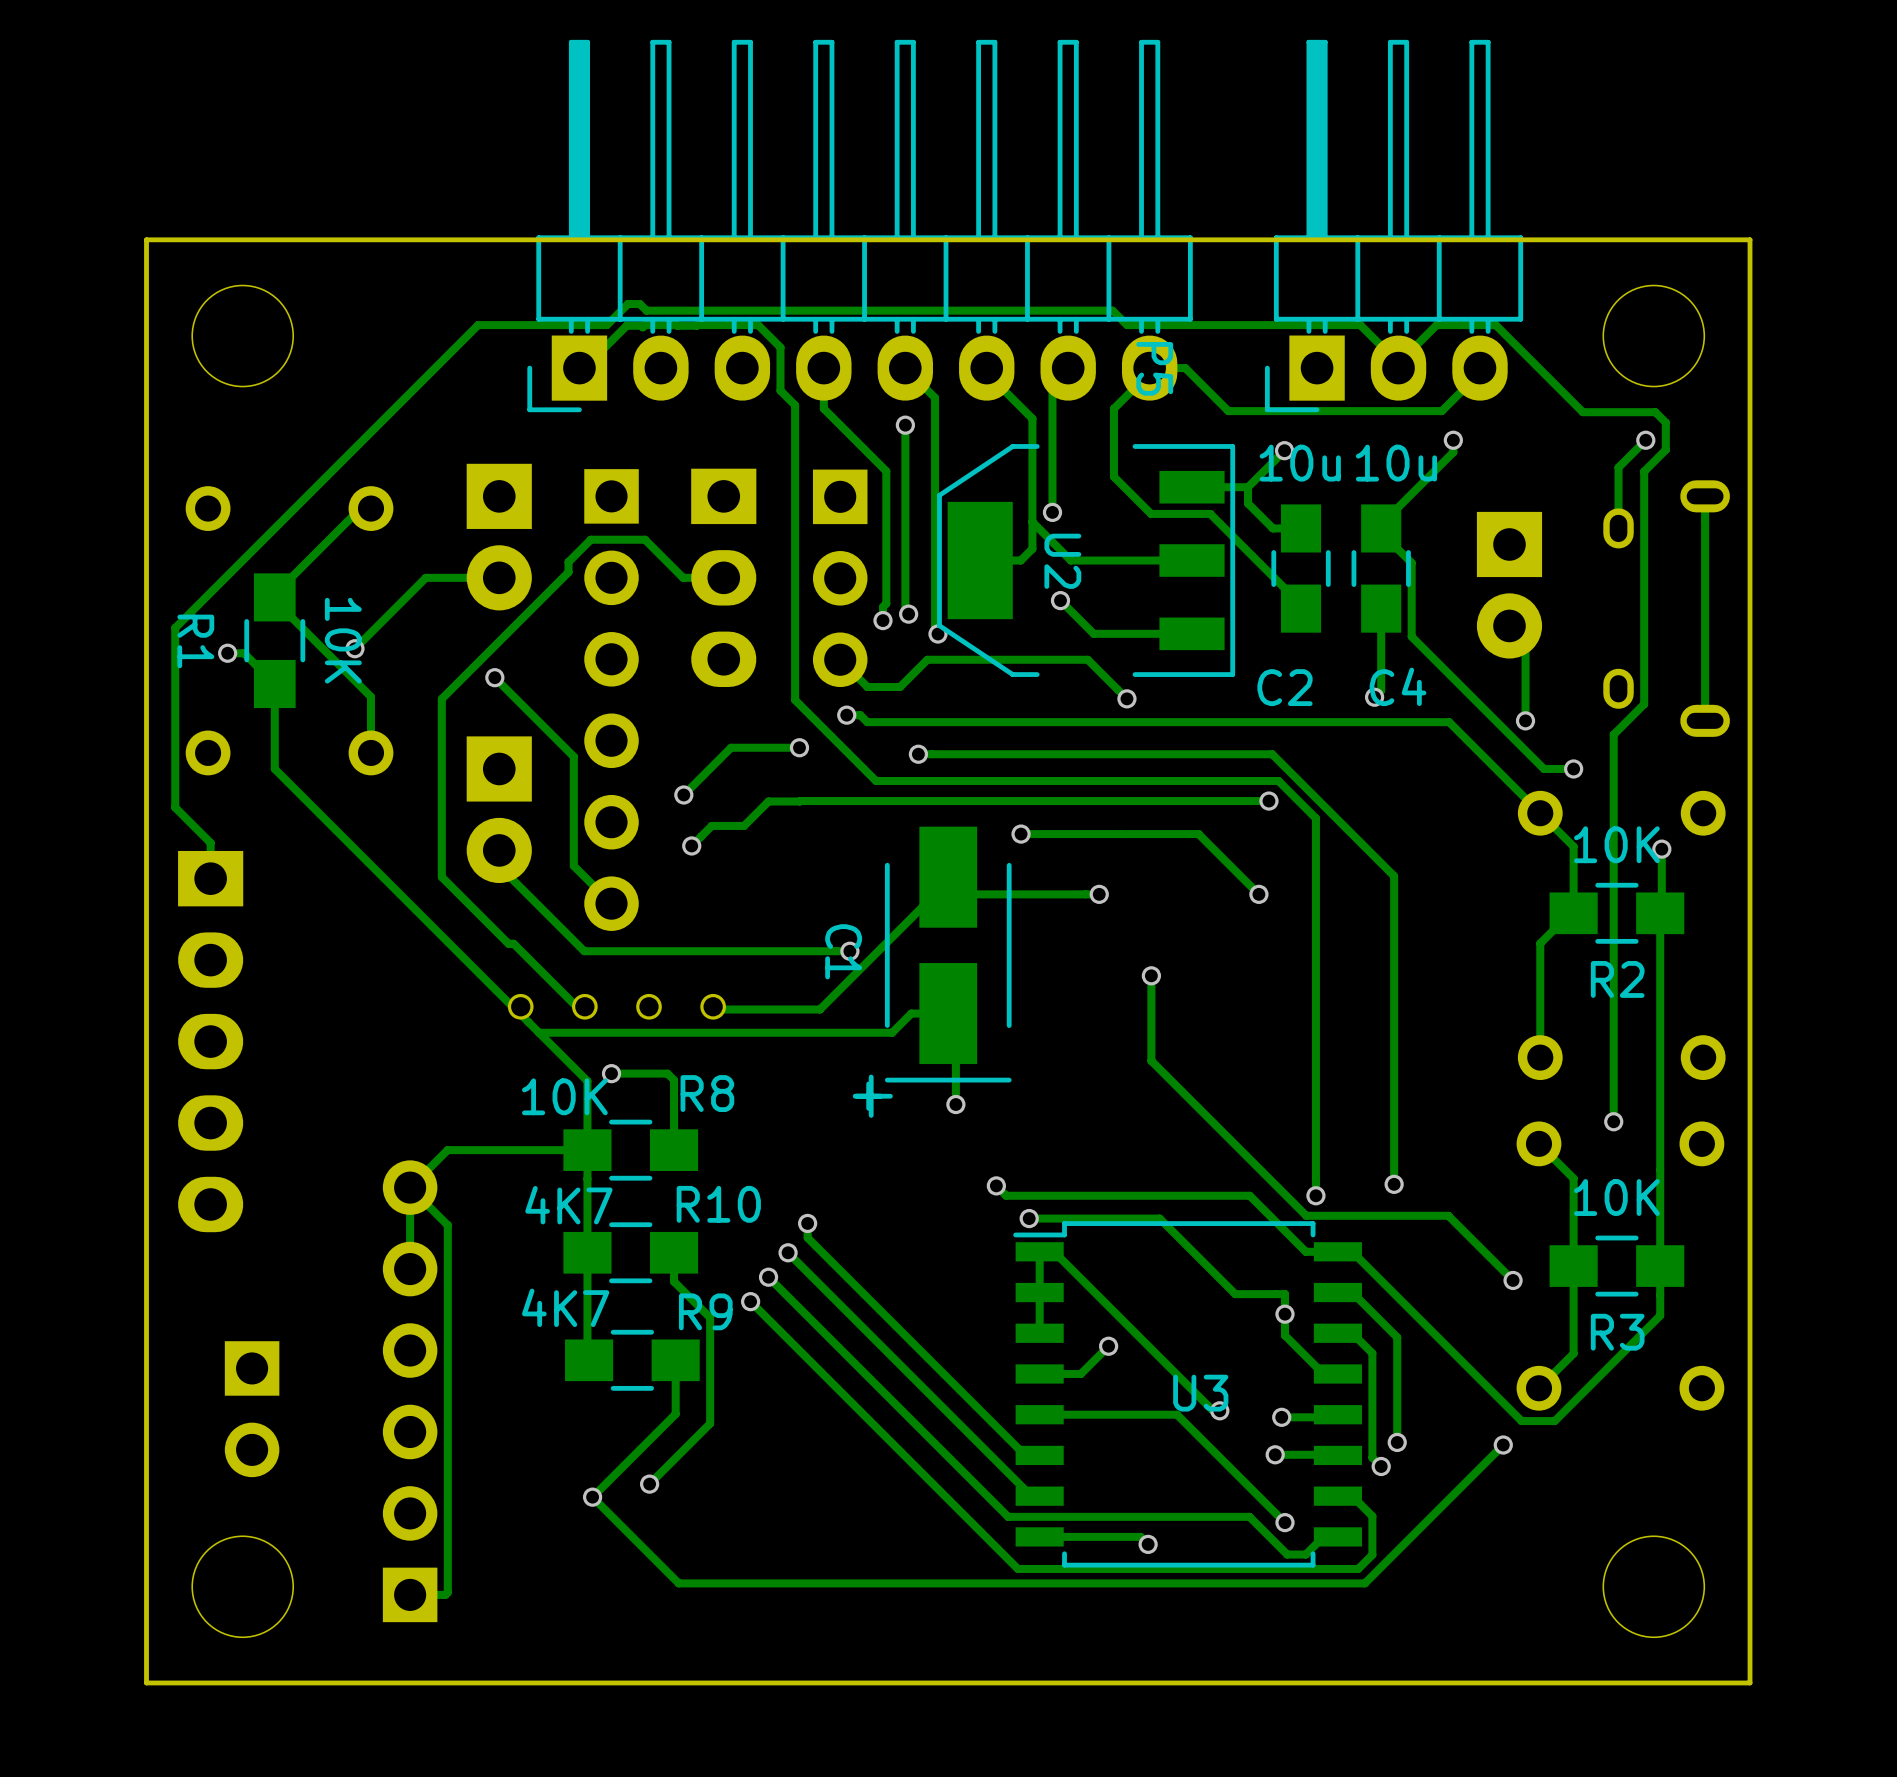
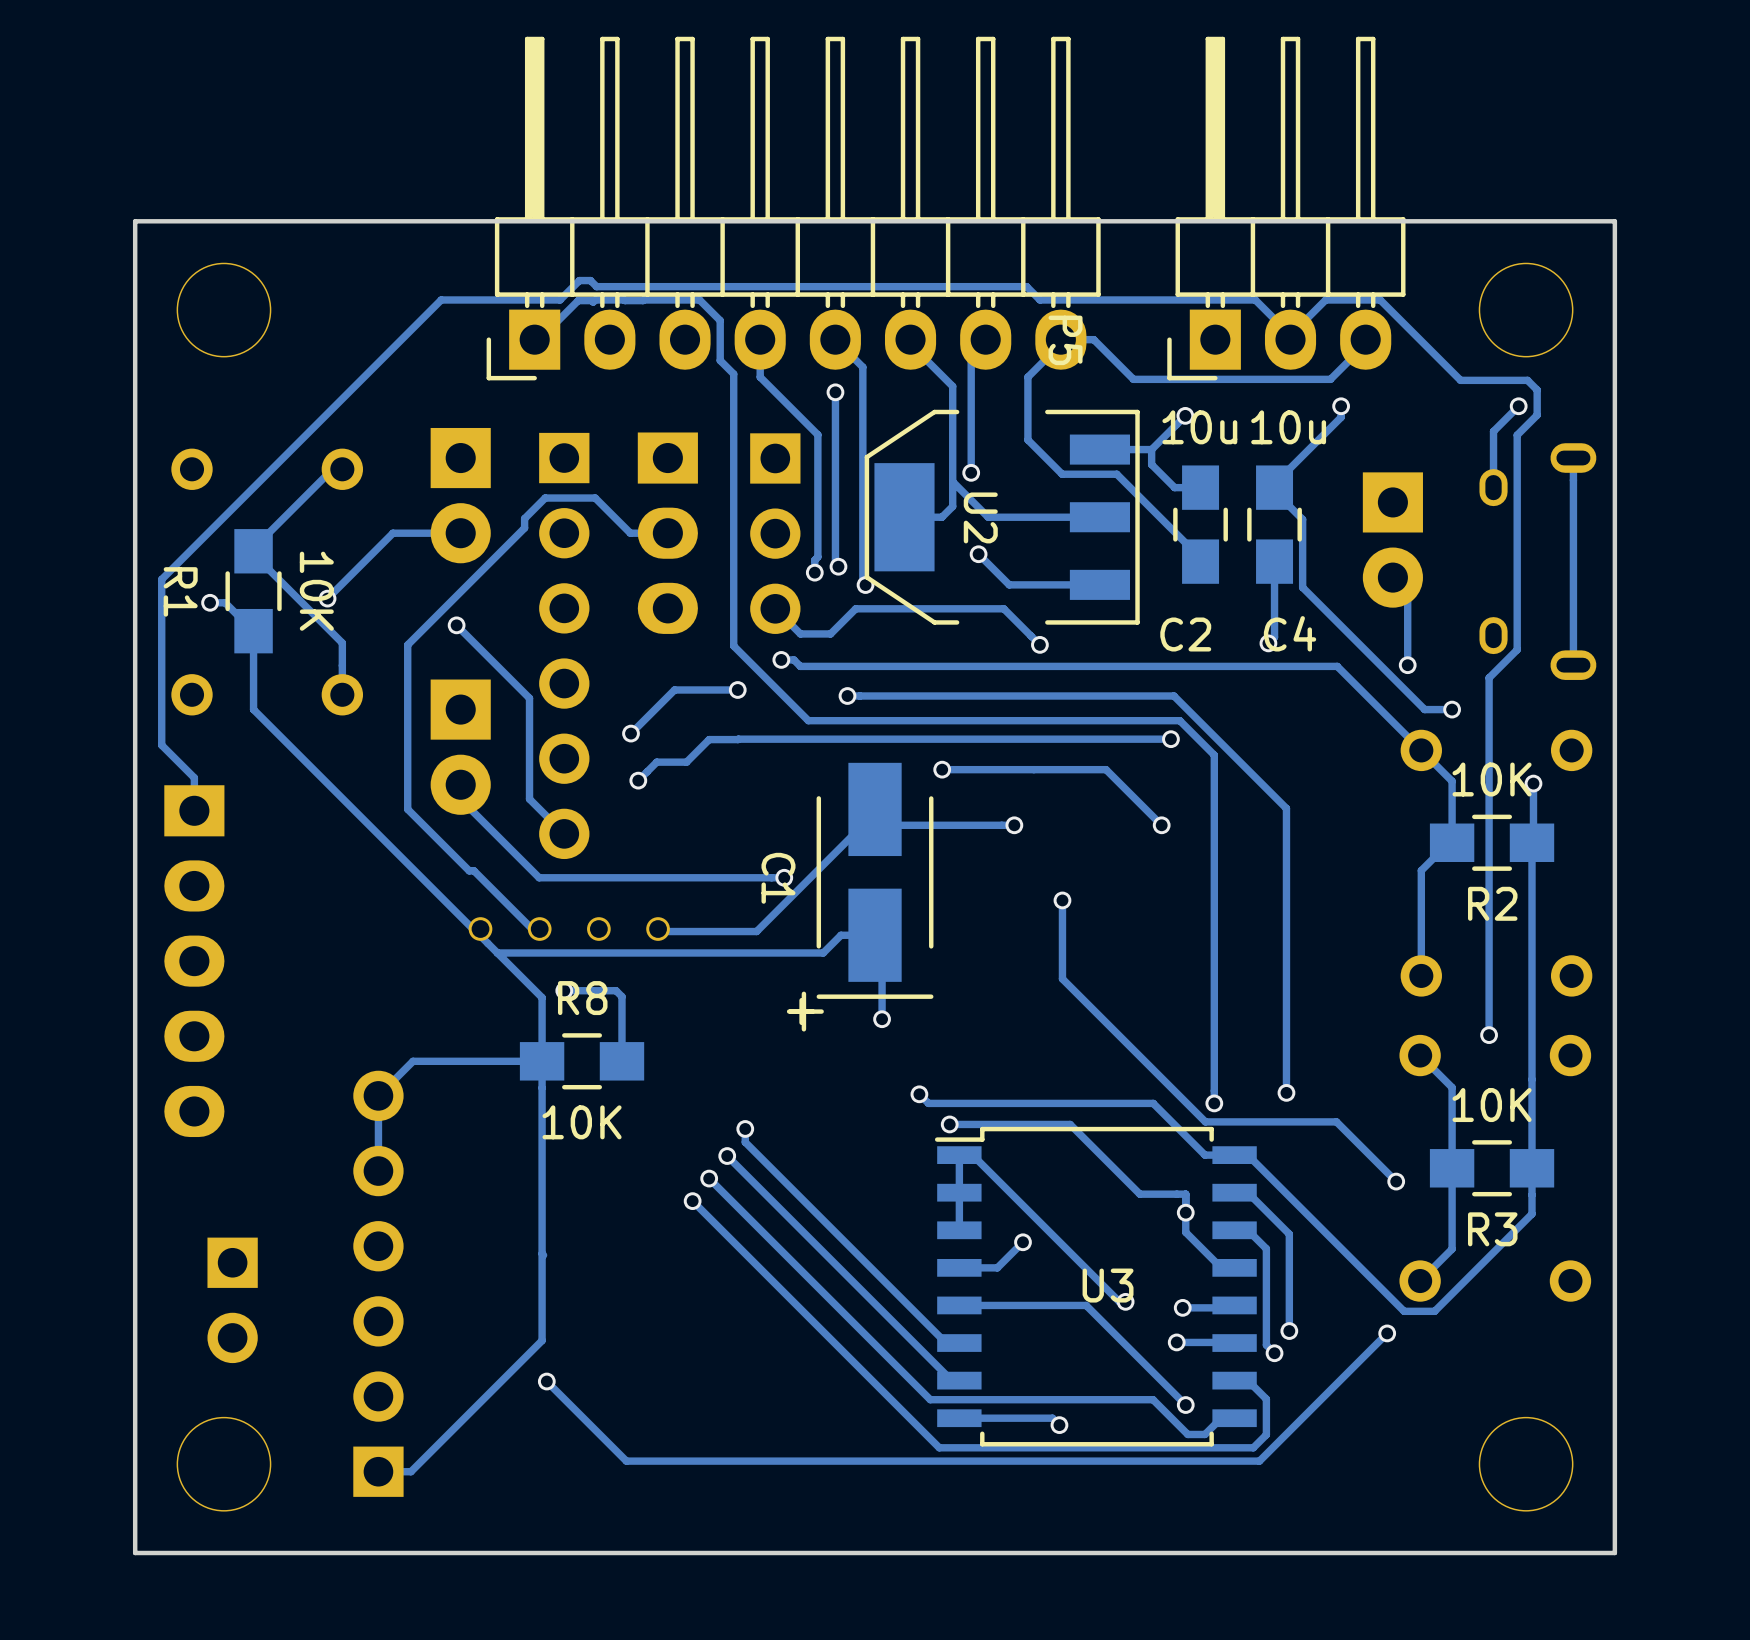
R8 name position: R8 (707, 1093) -> R8 (582, 998)
R8 value position: 10K (564, 1096) -> 10K (582, 1122)
track: (410, 1187) (447, 1225) (447, 1592) -> (542, 1253) (542, 1340) (413, 1469)
R10: 4K7 (630, 1252) -> none
track: (674, 1252) (674, 1281) (710, 1317) (710, 1423) (649, 1484) -> none
R9: 4K7 (632, 1360) -> none
track: (675, 1360) (675, 1414) (592, 1497) -> none
via: (649, 1484) -> none

